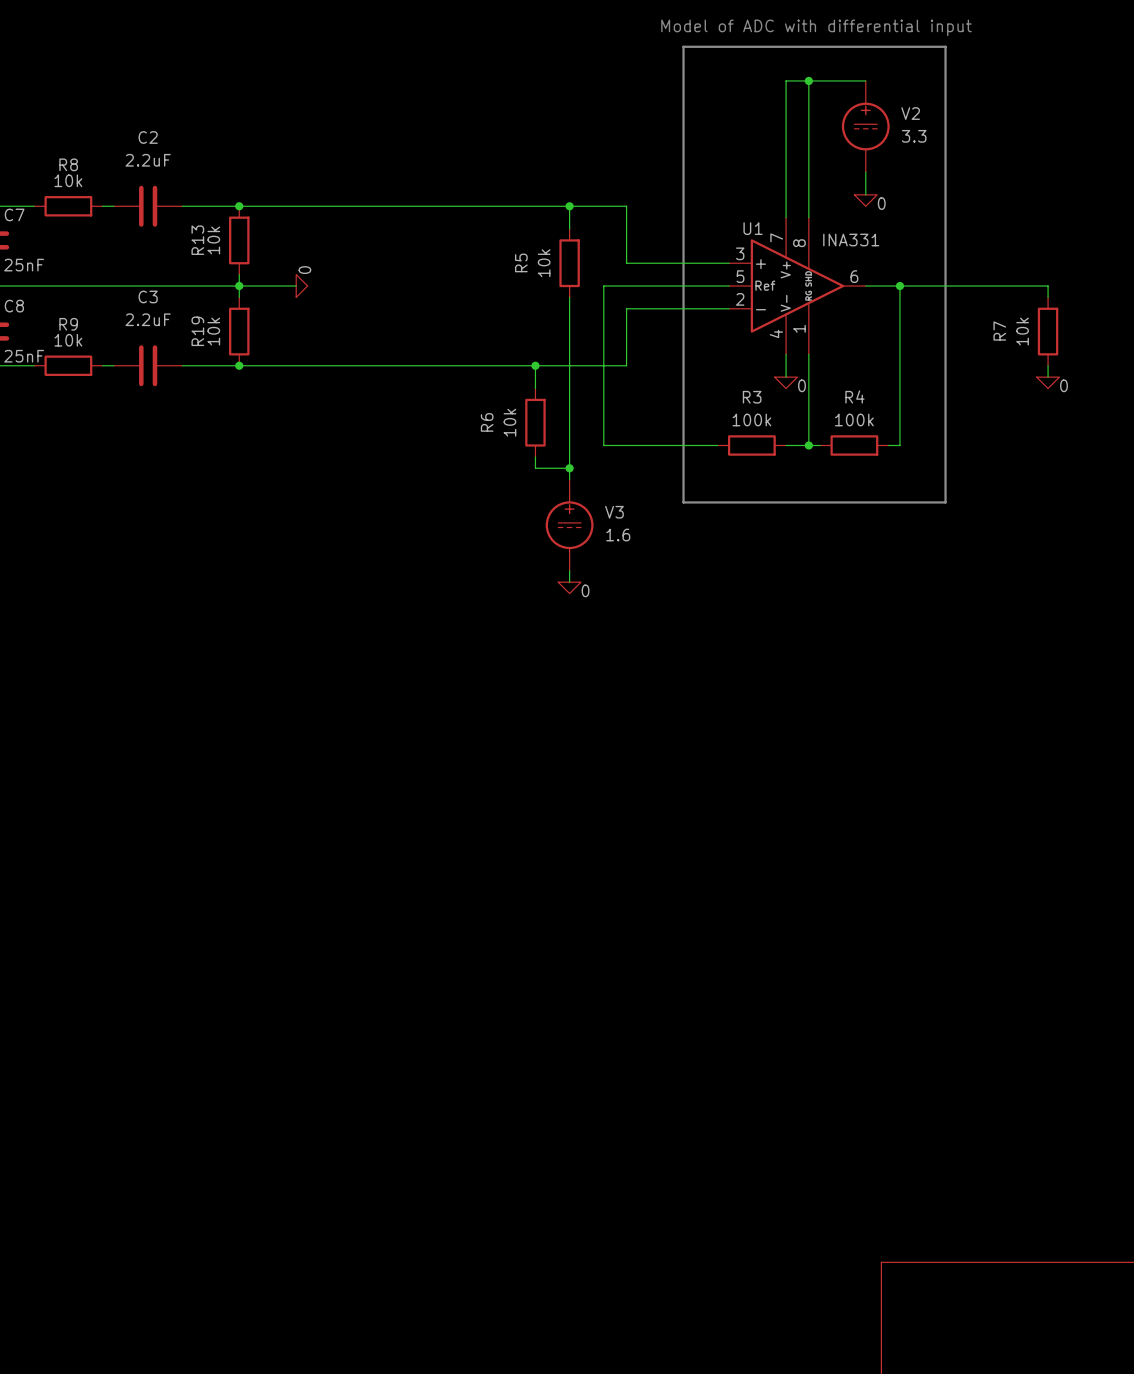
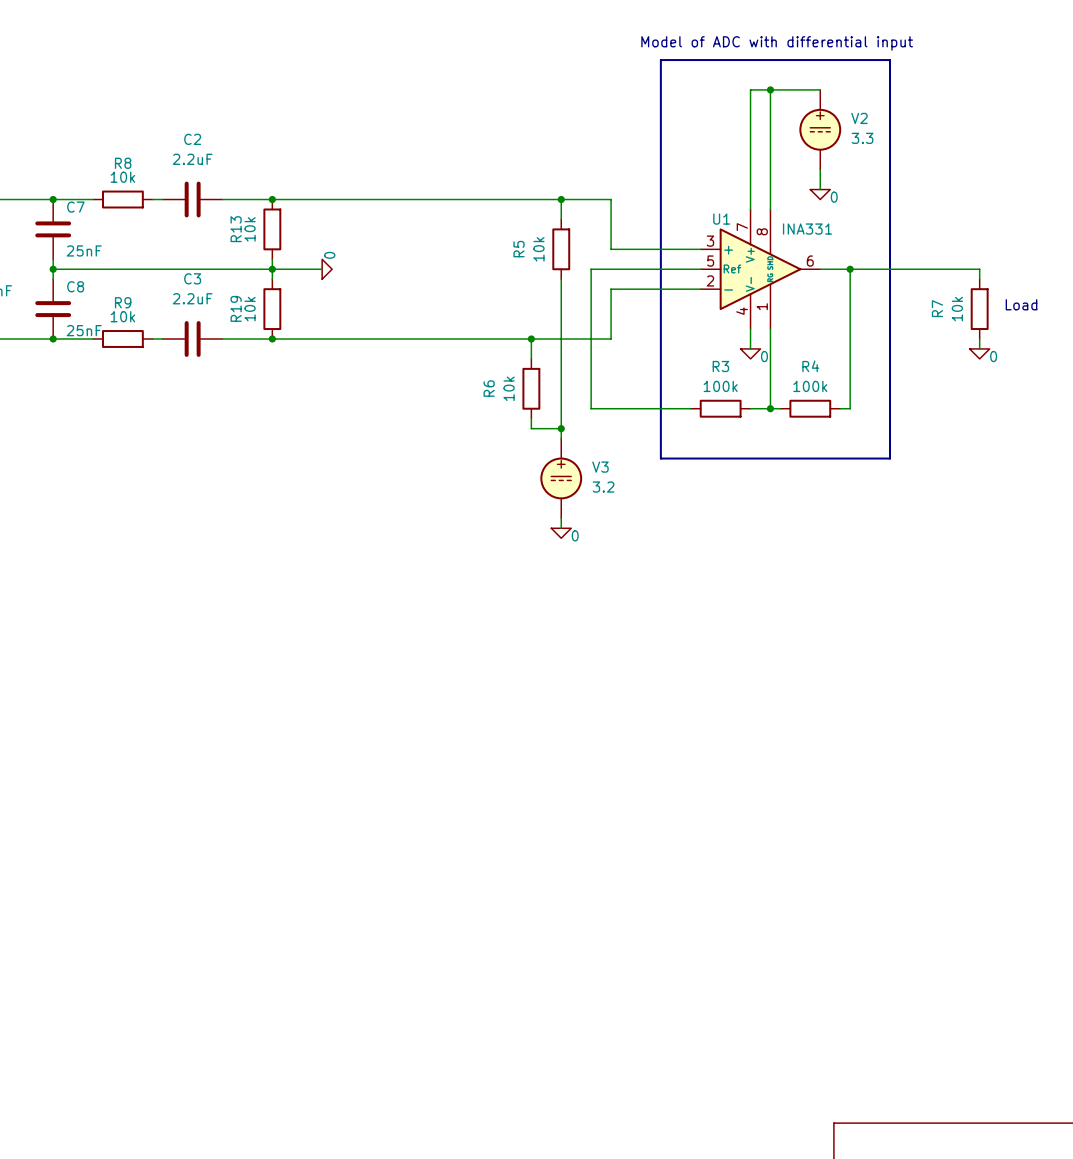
text: none -> Load (1021, 304)
V3 value: 1.6 (618, 535) -> 3.2 (603, 487)

